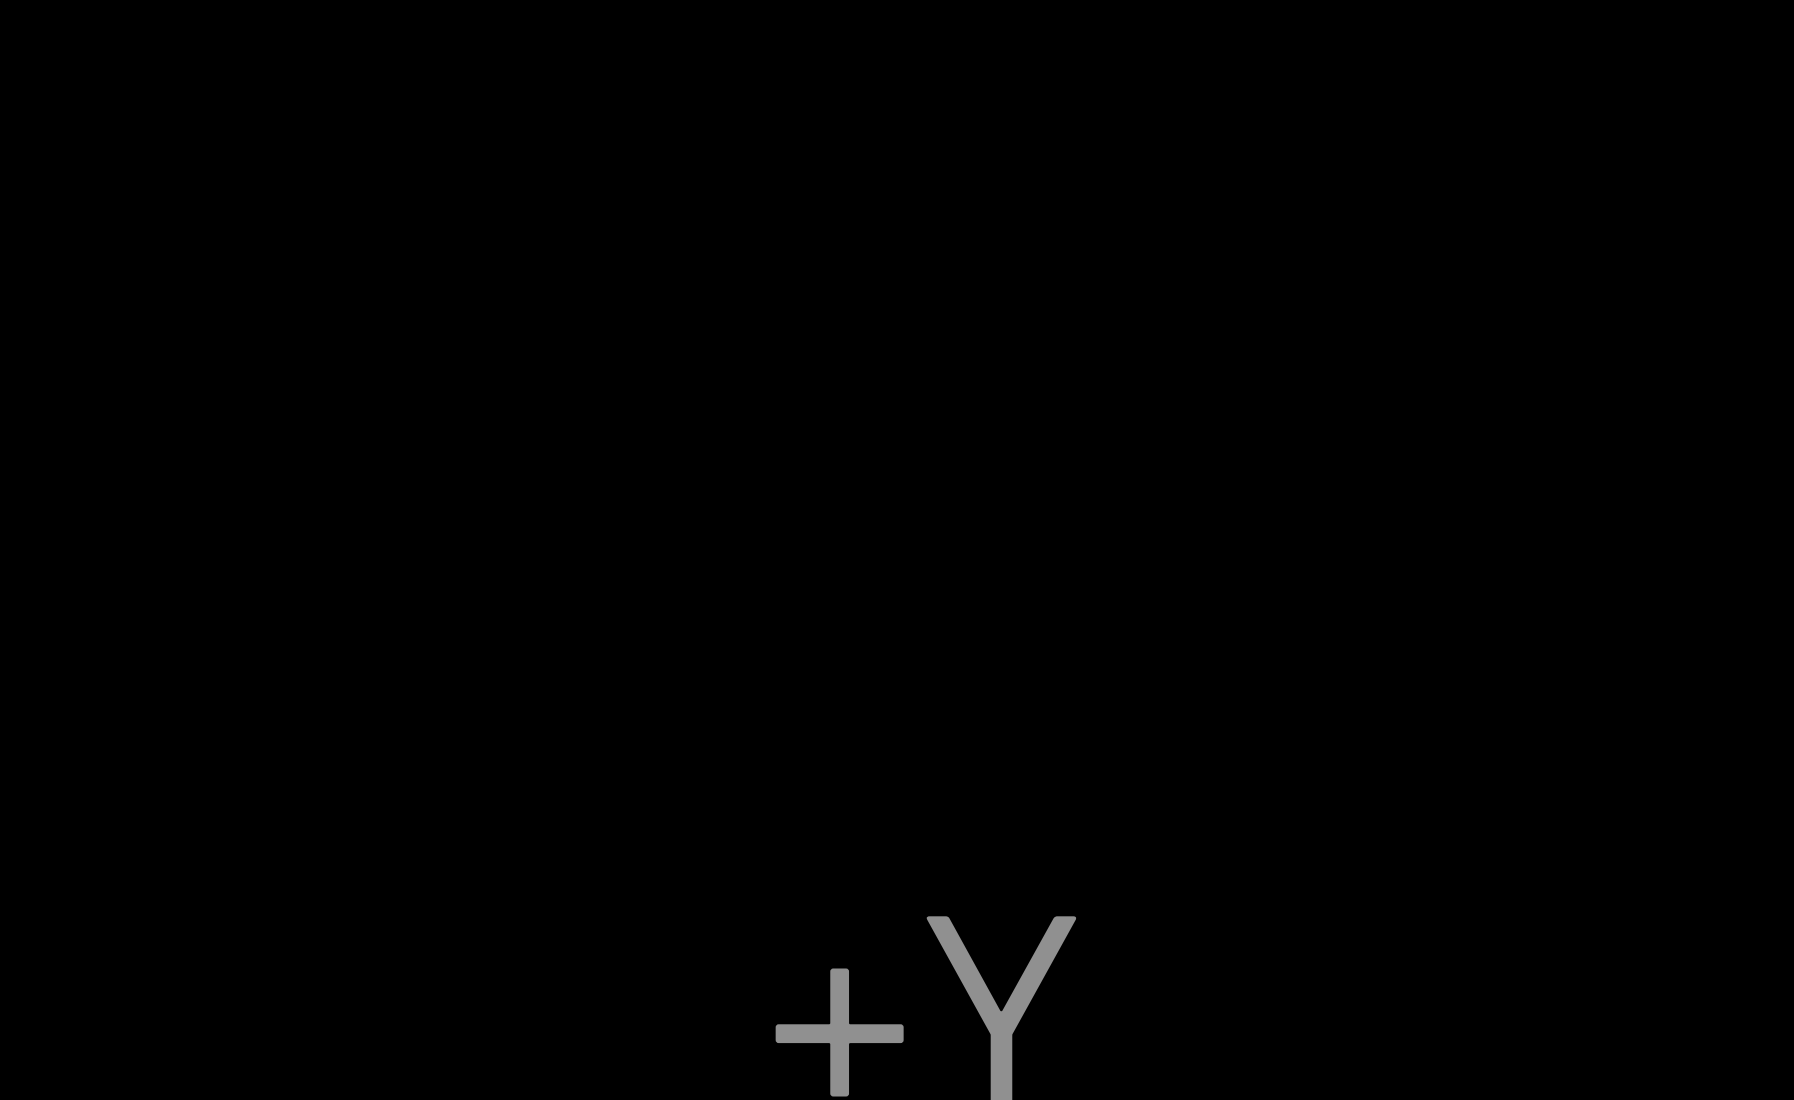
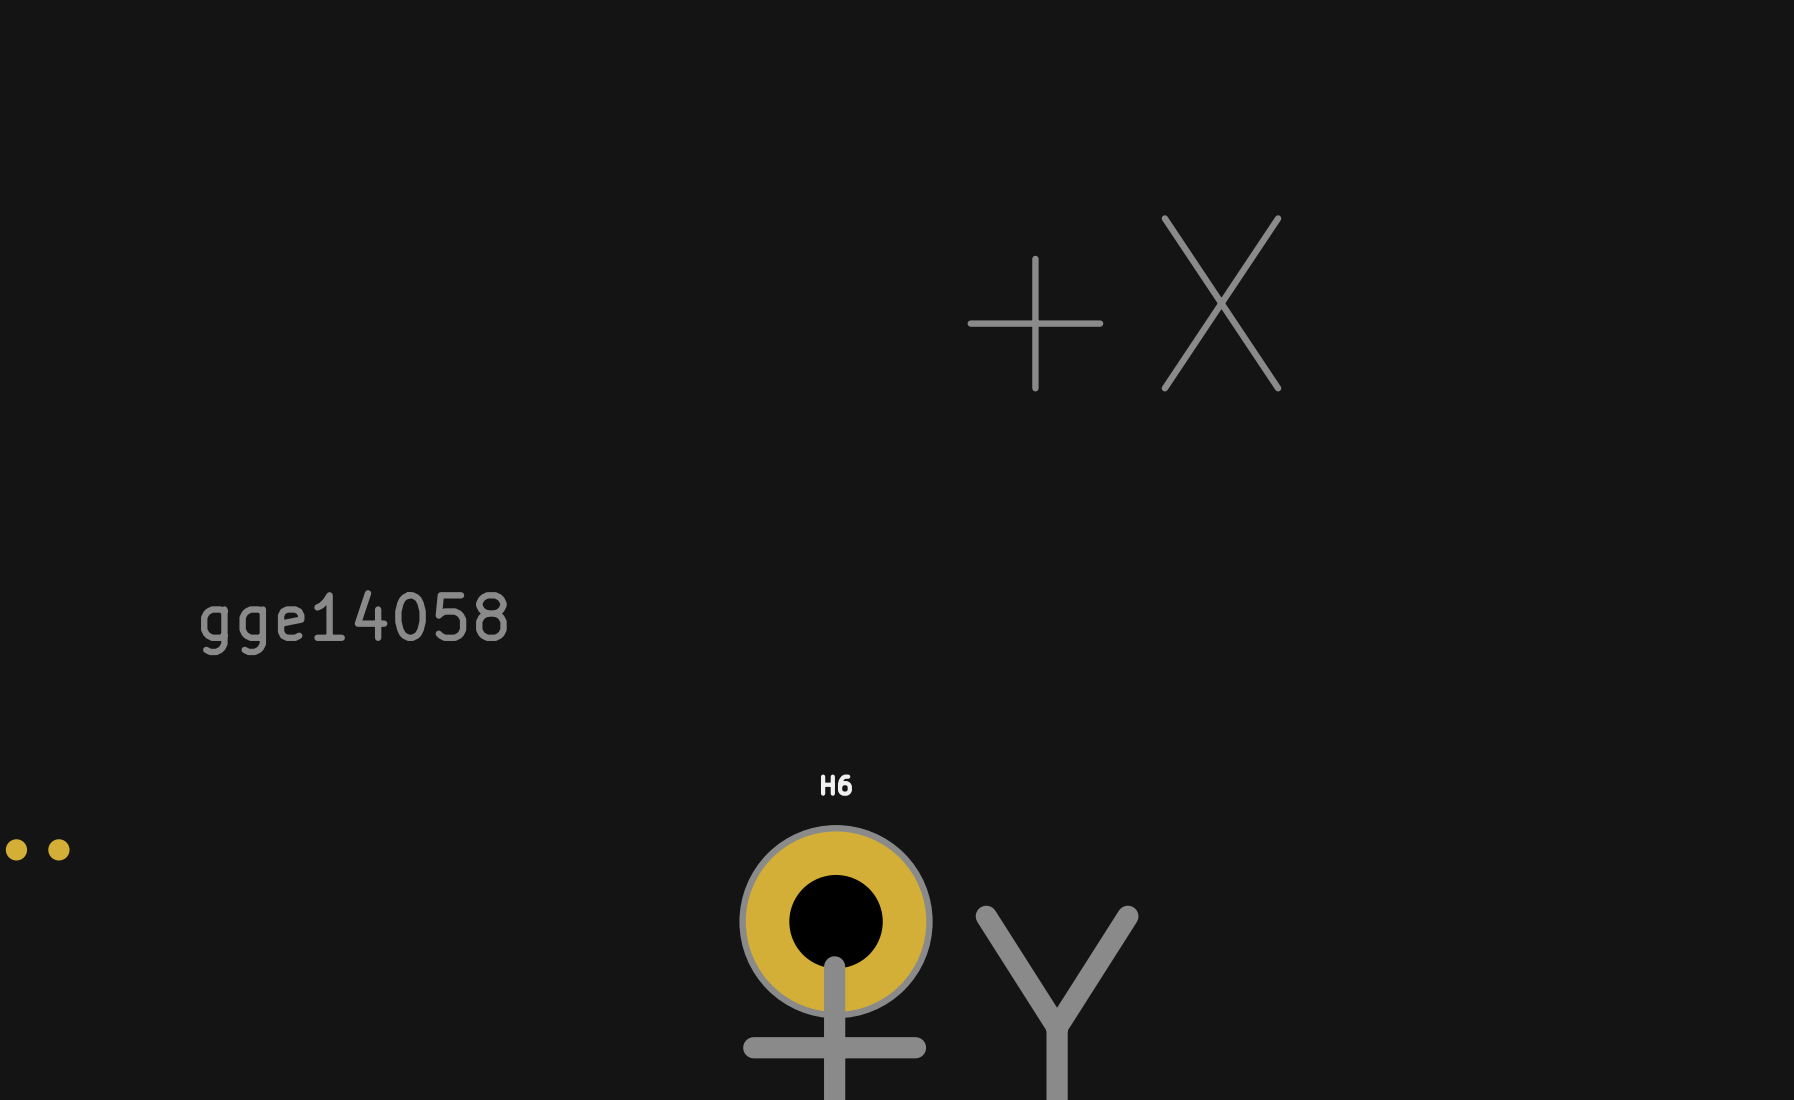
text: none -> +X (1124, 303)
part: none -> (353, 622)
part: none -> (37, 849)
H6: none -> (836, 921)

